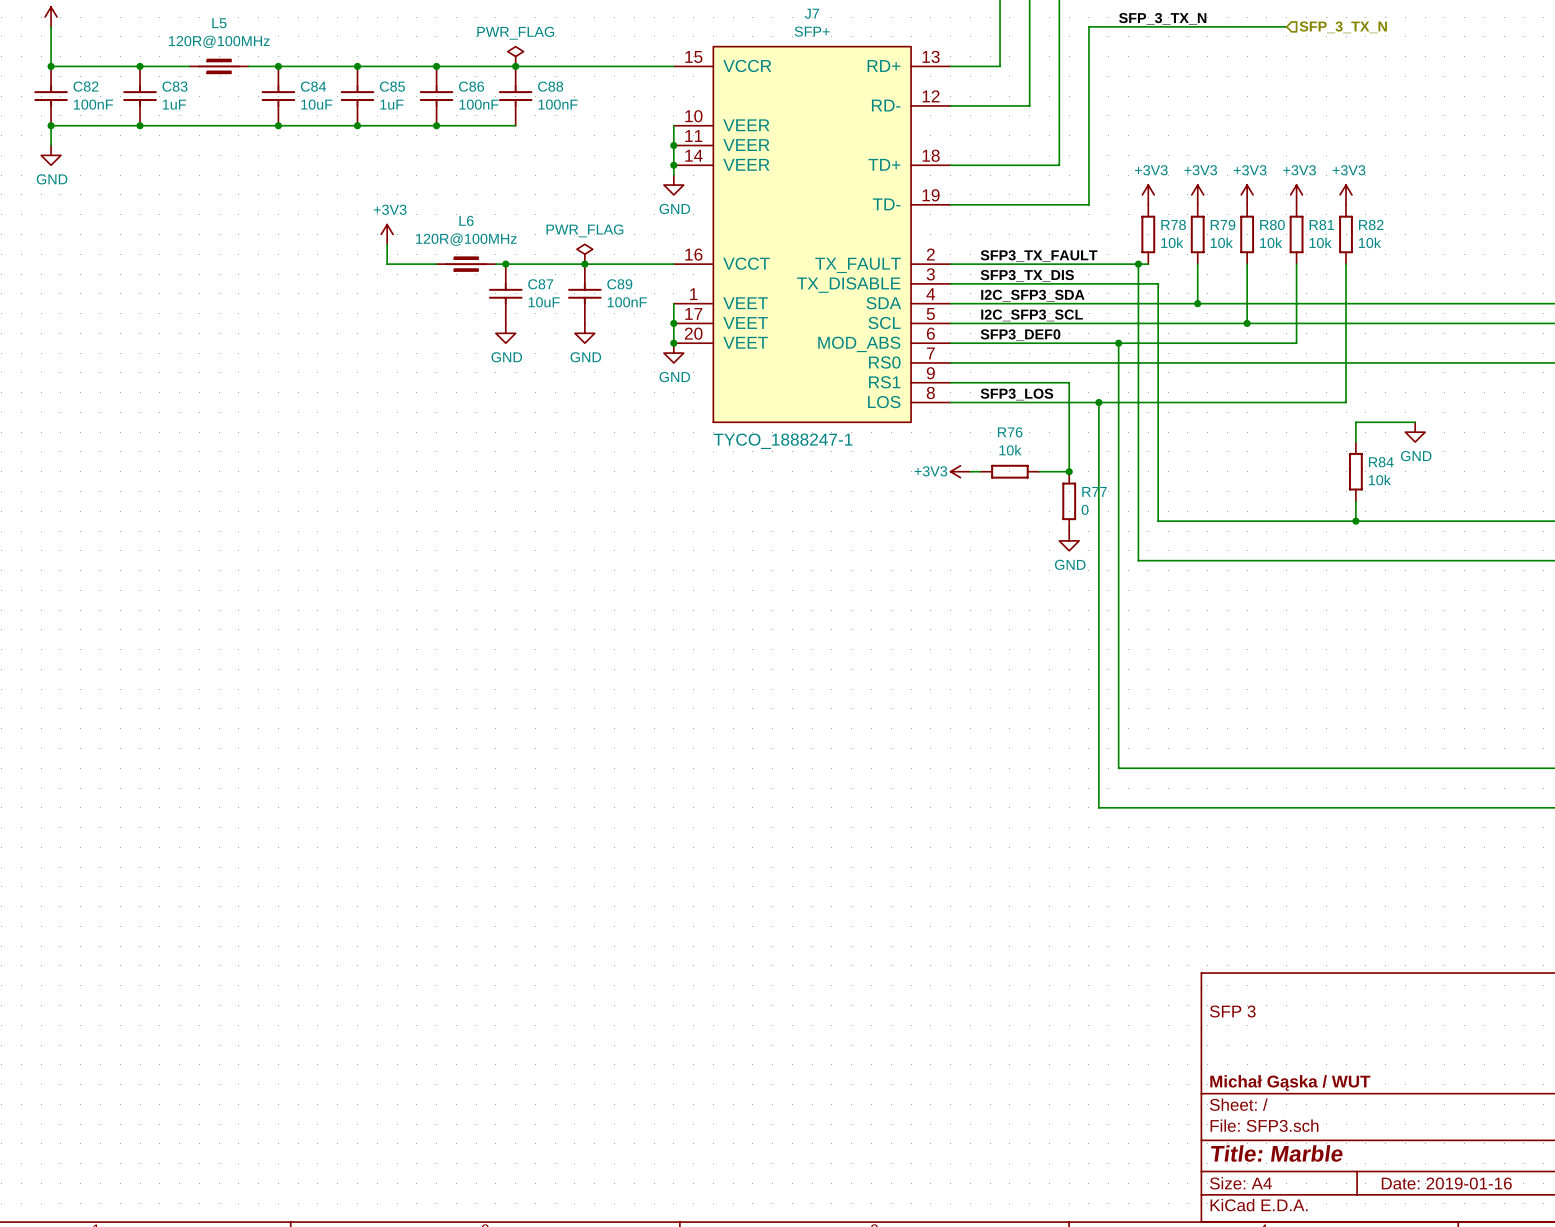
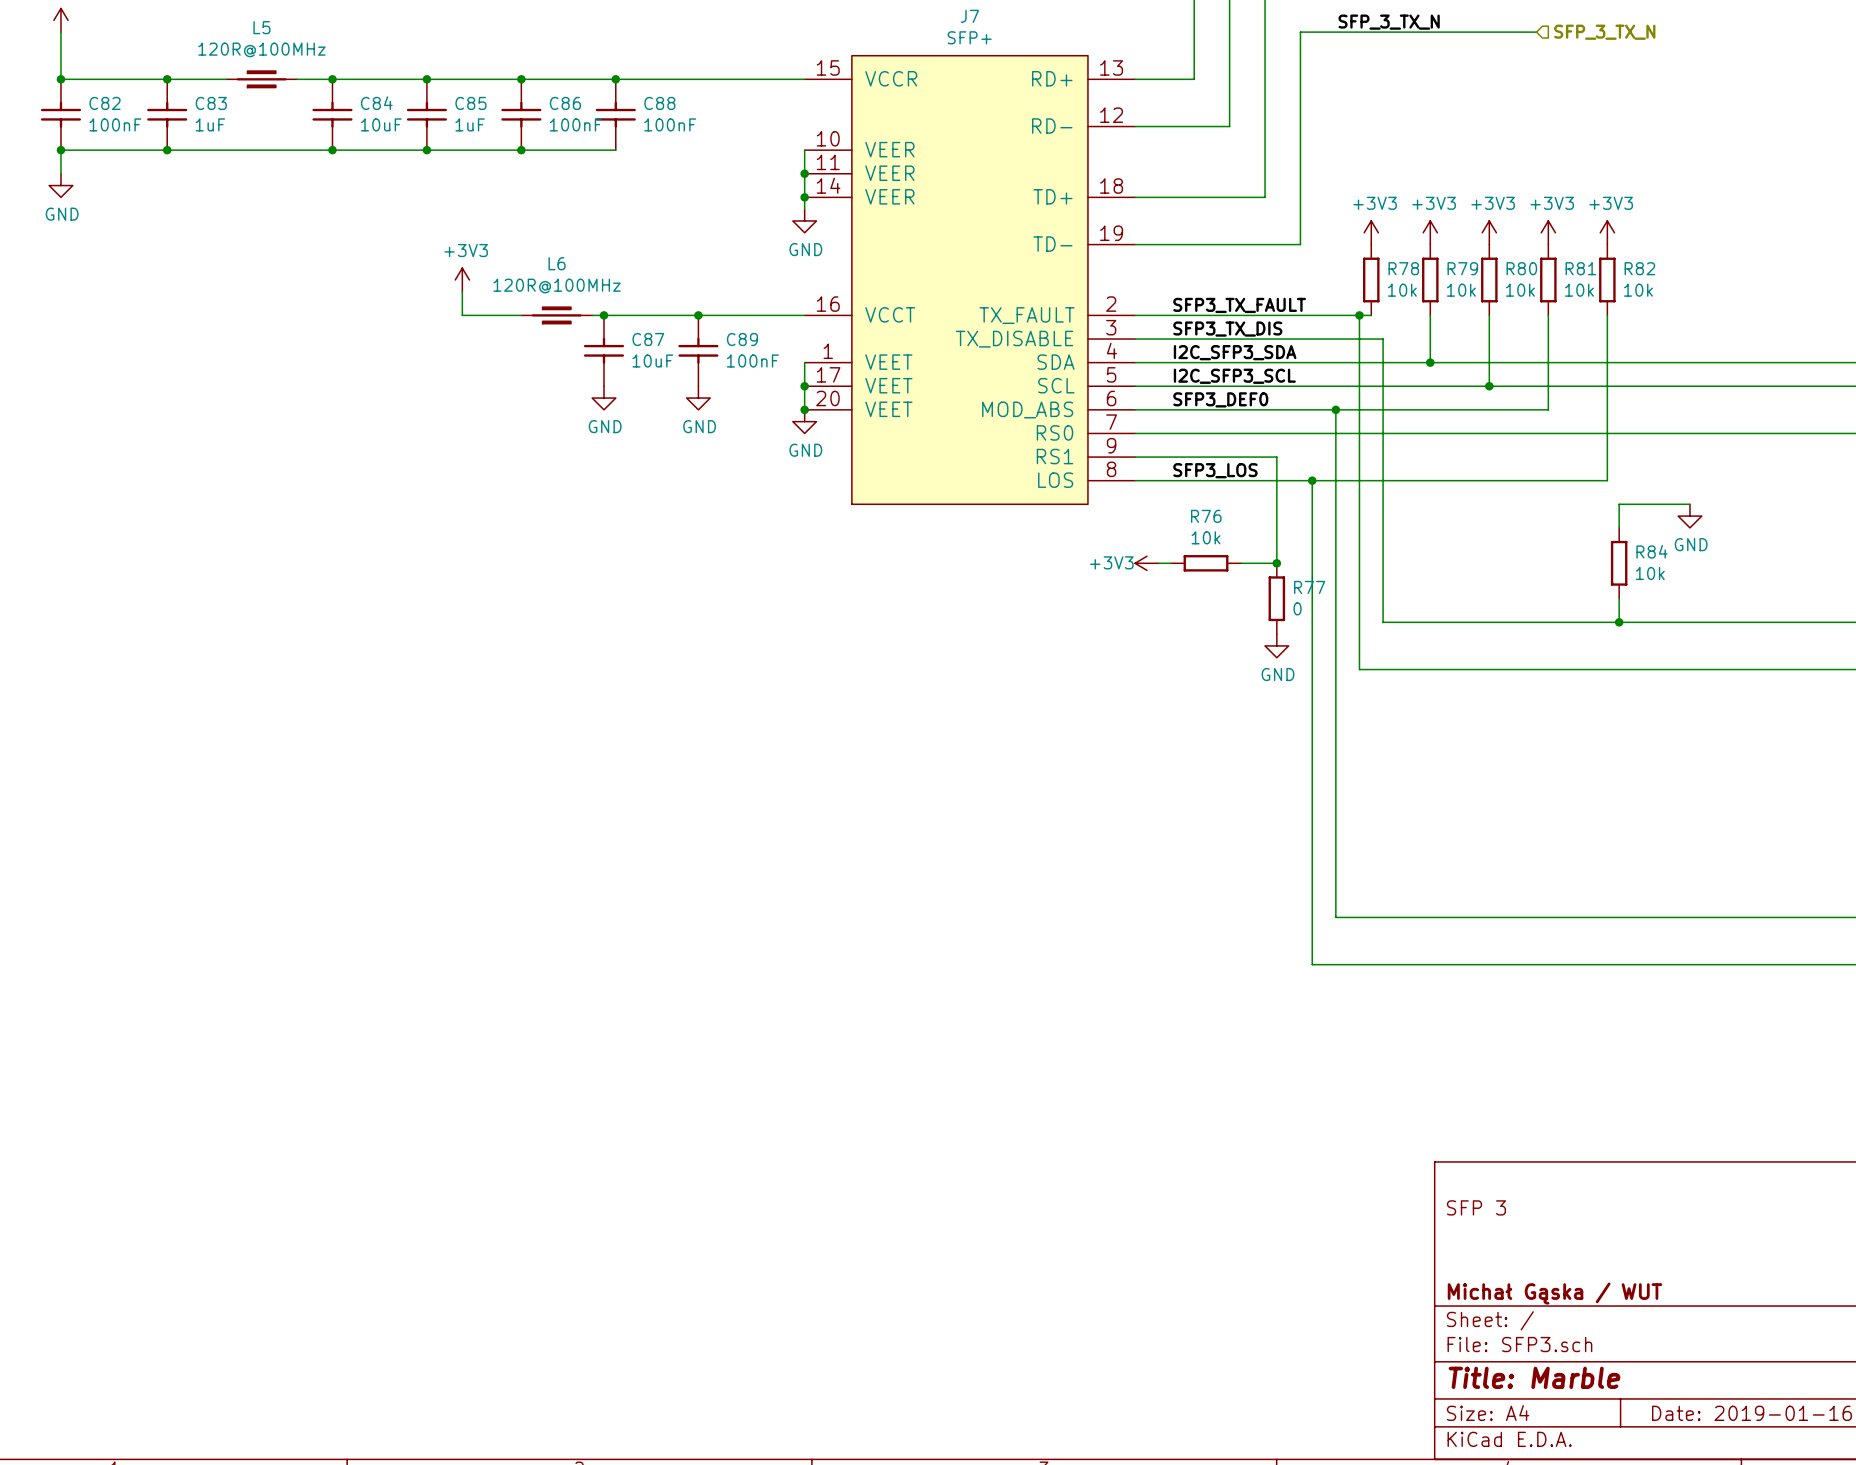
power symbol: PWR_FLAG (515, 56) -> none
power symbol: PWR_FLAG (584, 254) -> none
J7 value: TYCO_1888247-1 (783, 441) -> none

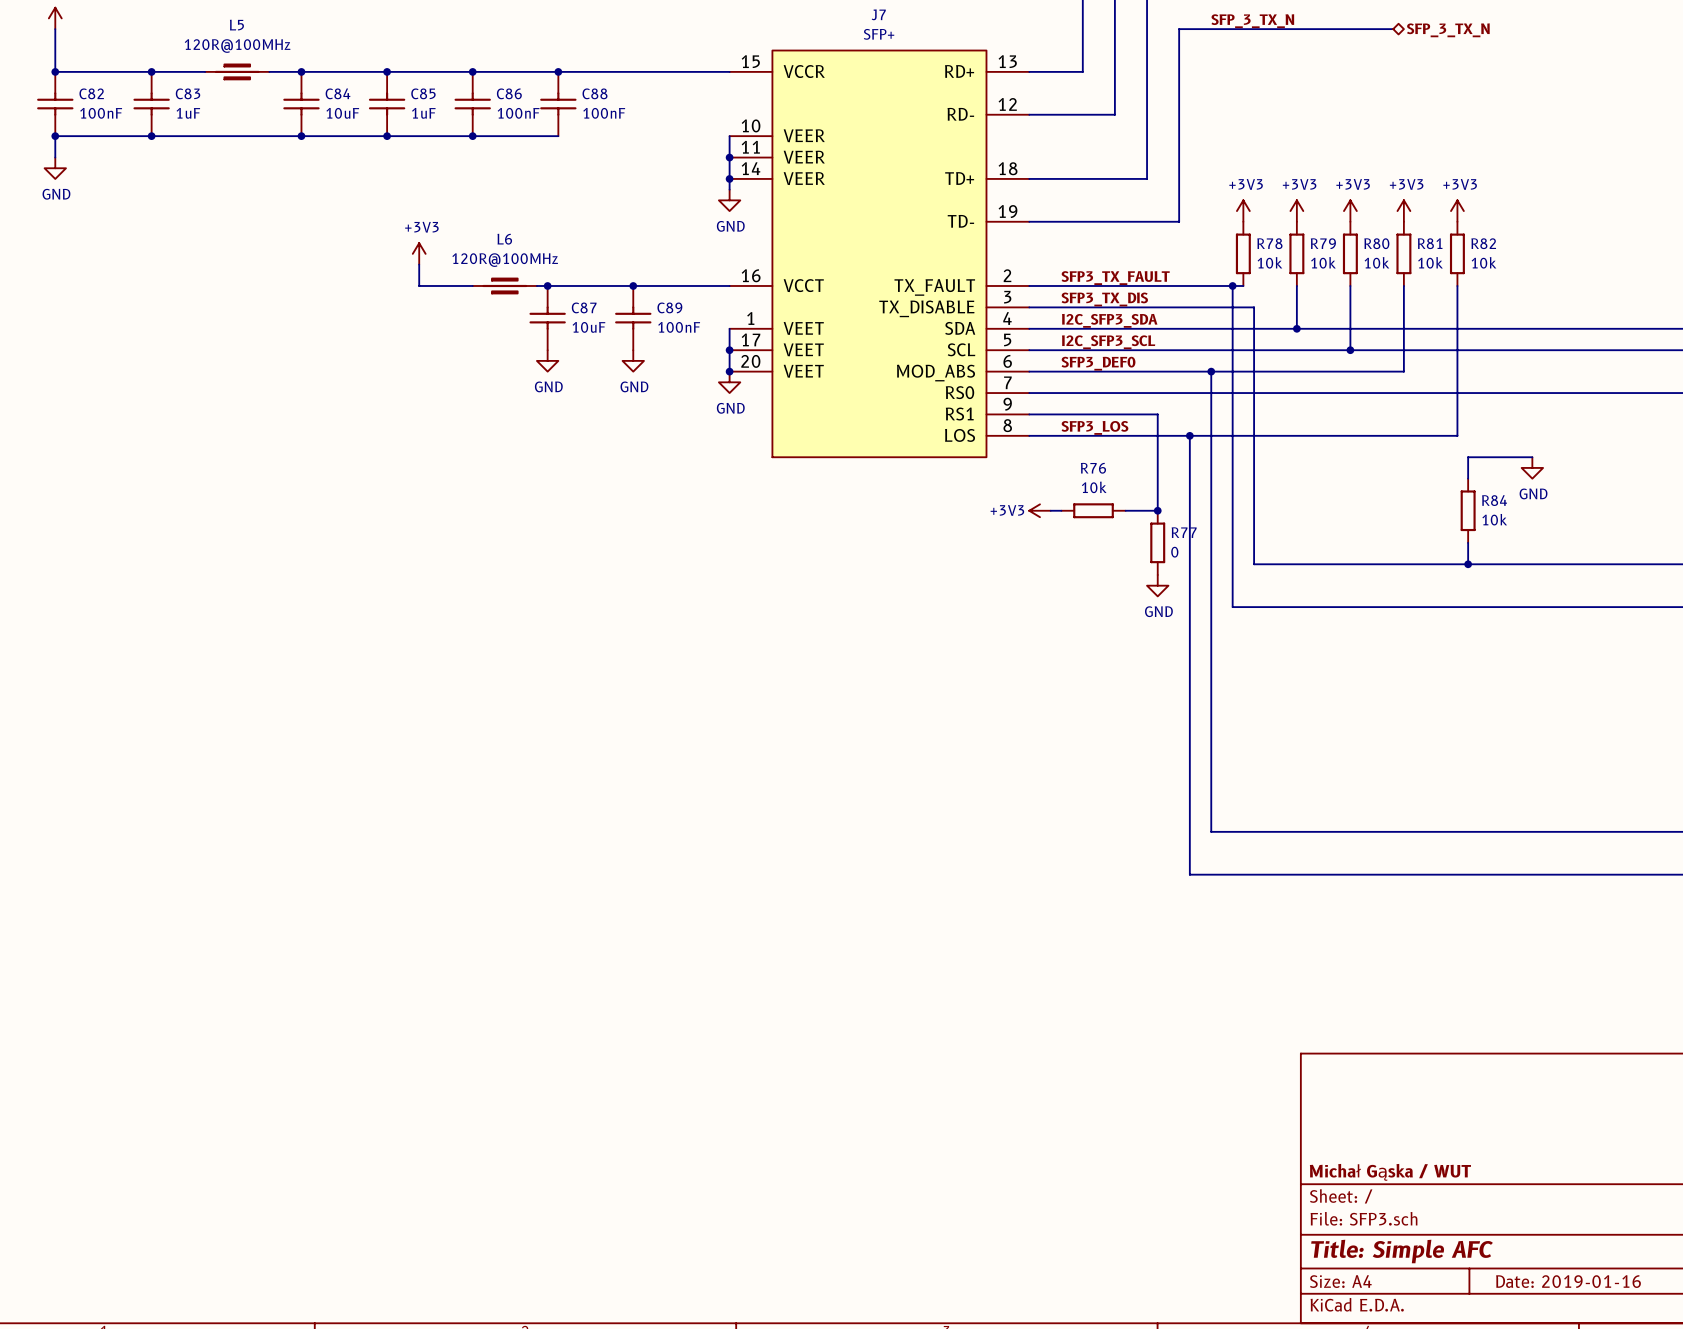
hierarchical label shape: input (1604, 32) -> bidirectional (1448, 30)
title block: SFP 3 (1476, 1207) -> none
title block: Title: Marble (1534, 1377) -> Title: Simple AFC (1402, 1251)

